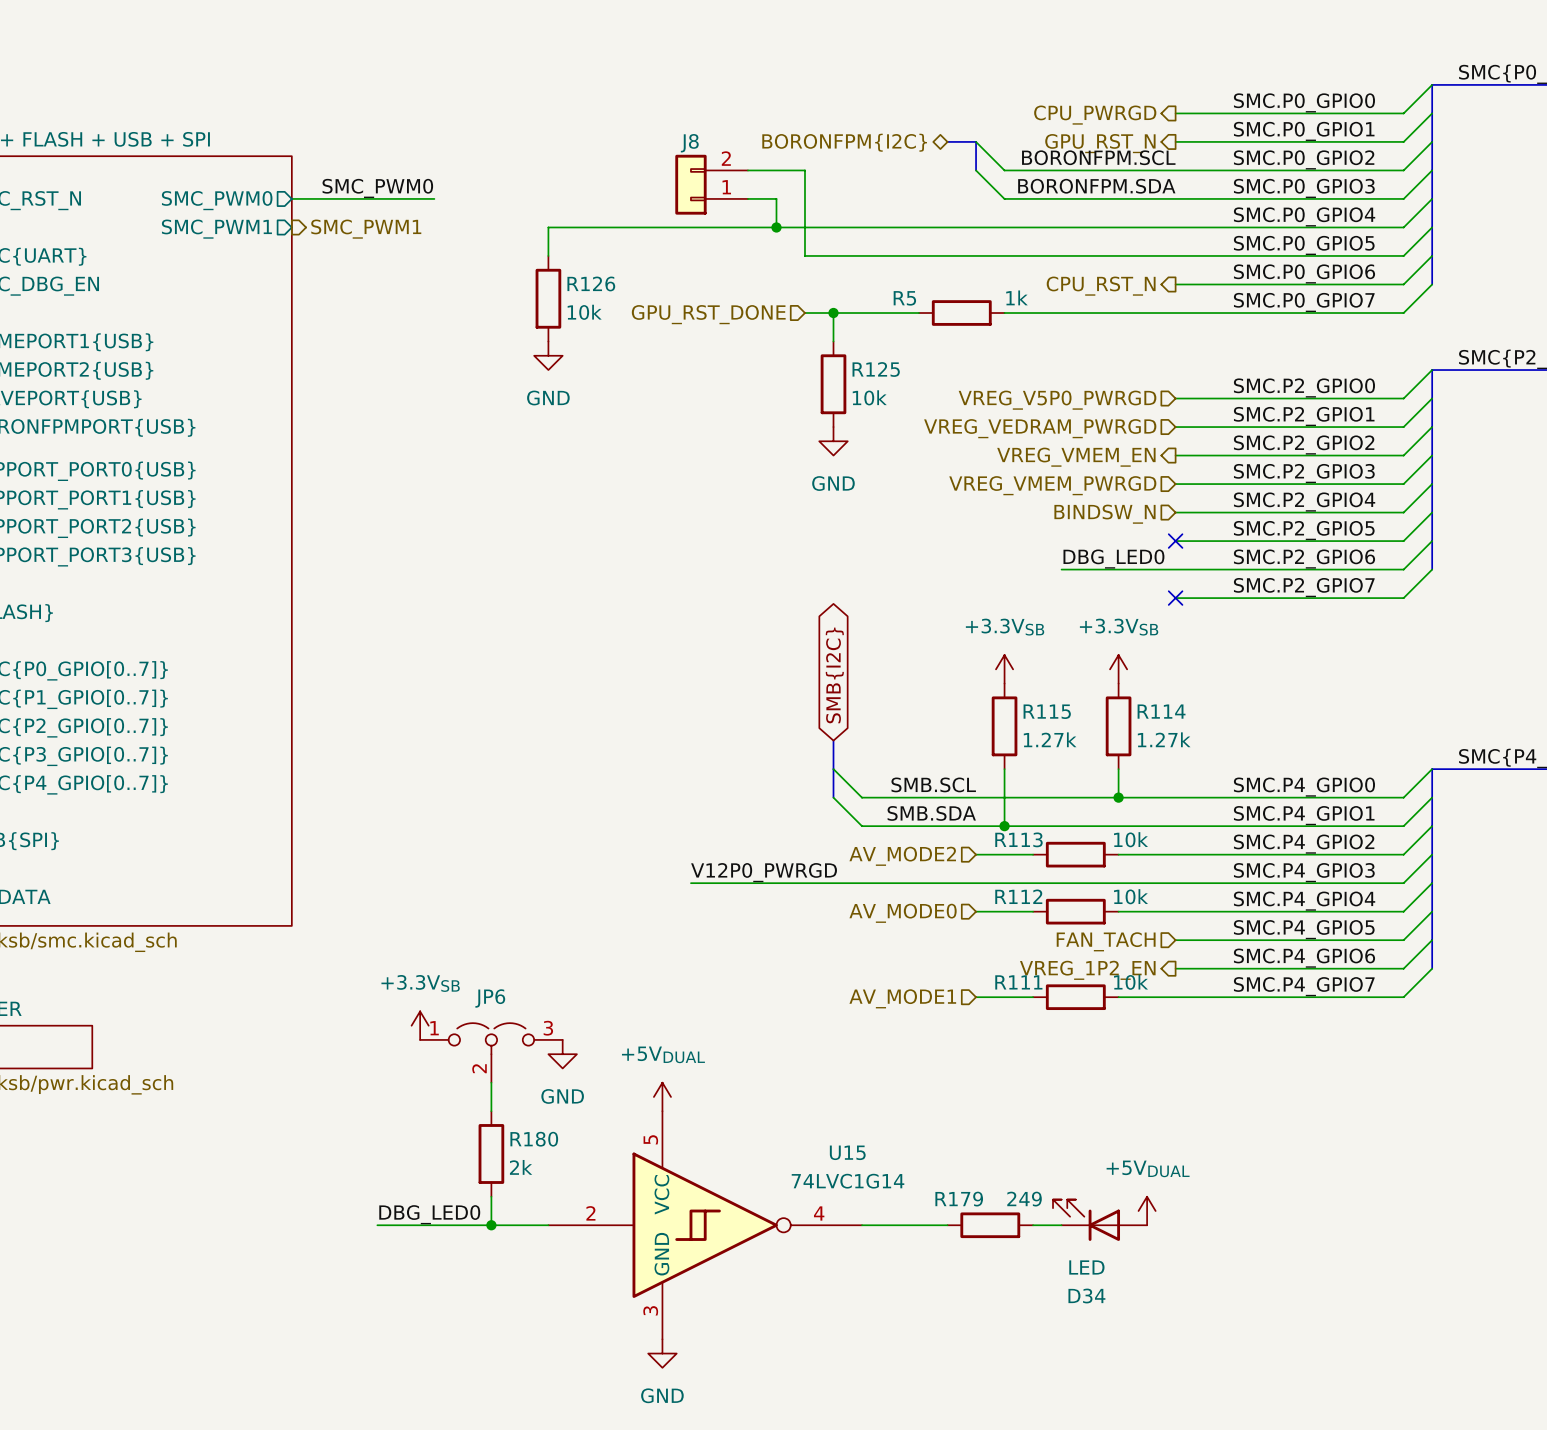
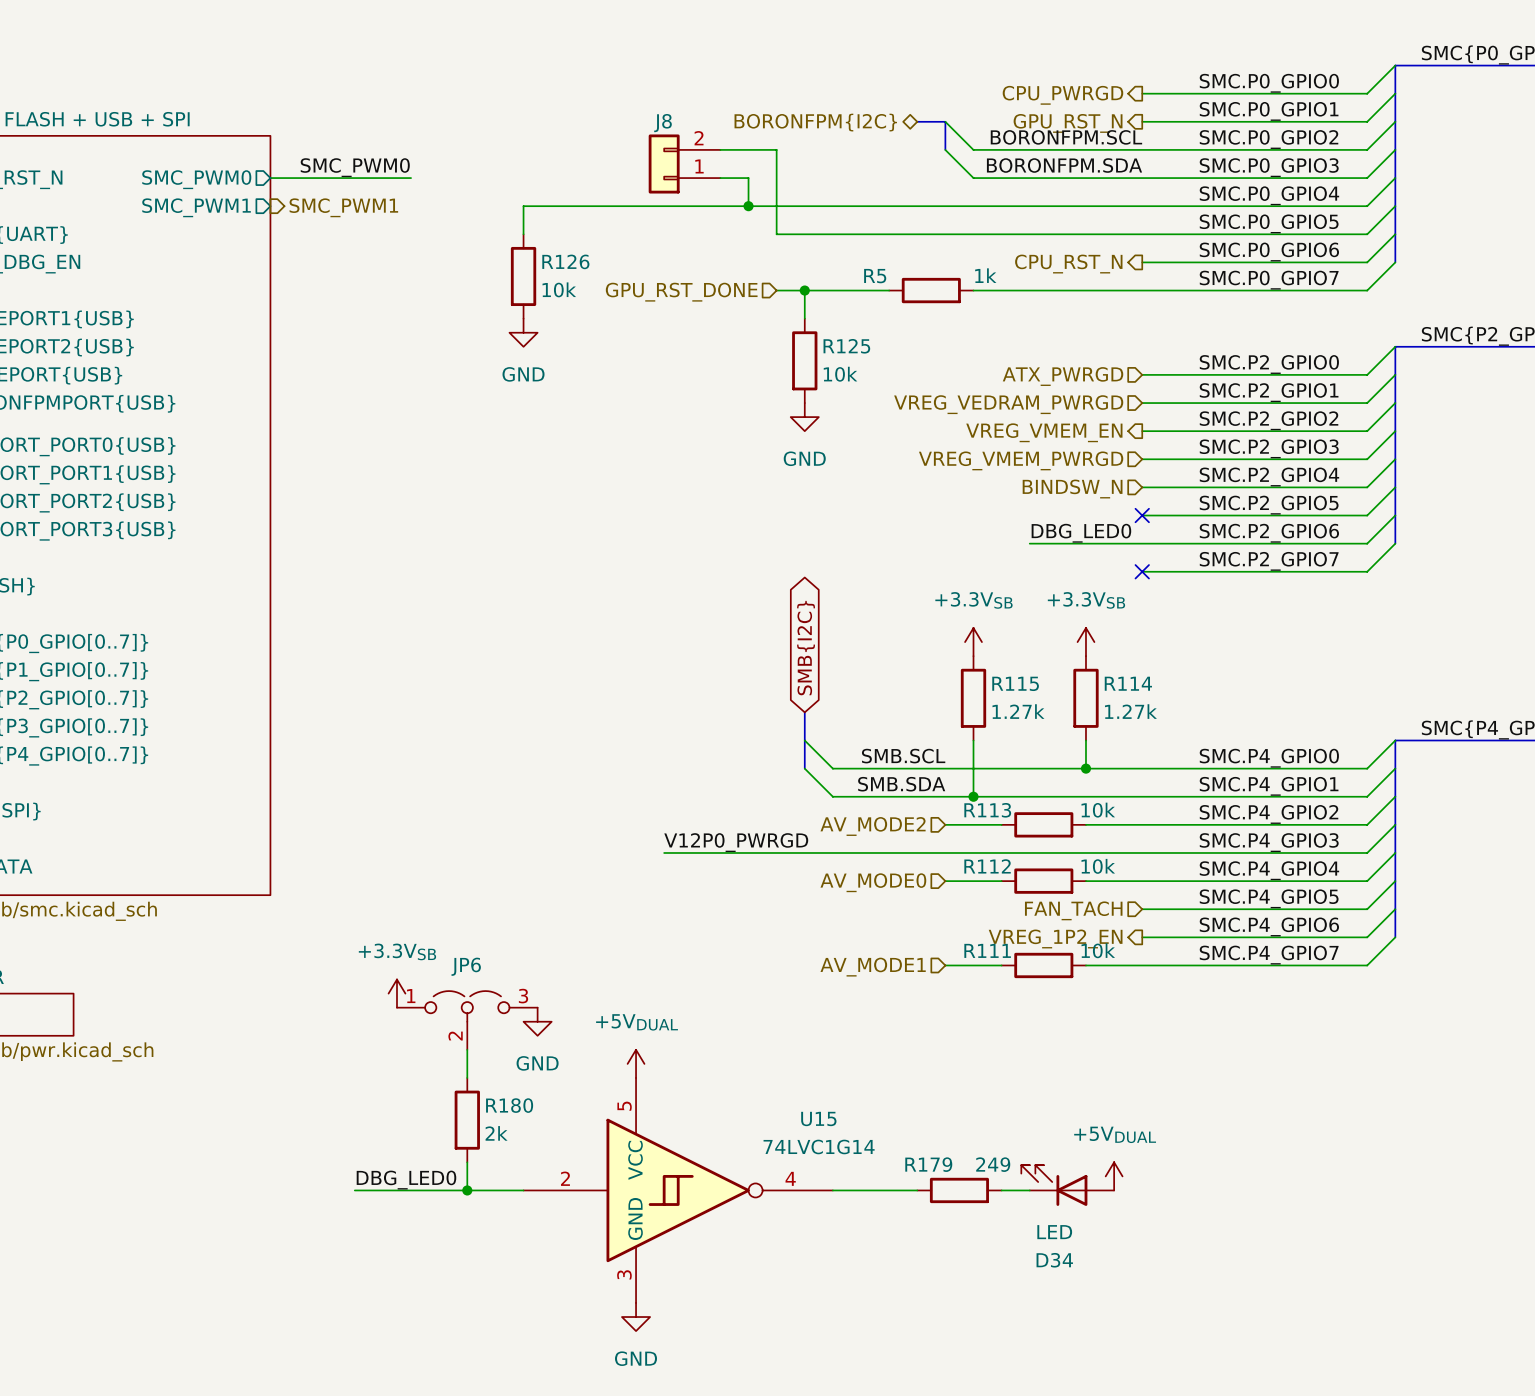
hierarchical label: VREG_V5P0_PWRGD (1057, 400) -> ATX_PWRGD (1063, 376)

